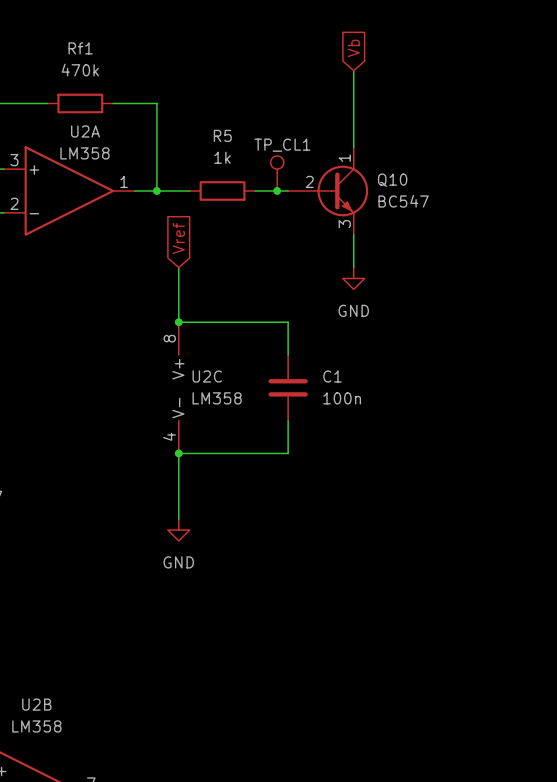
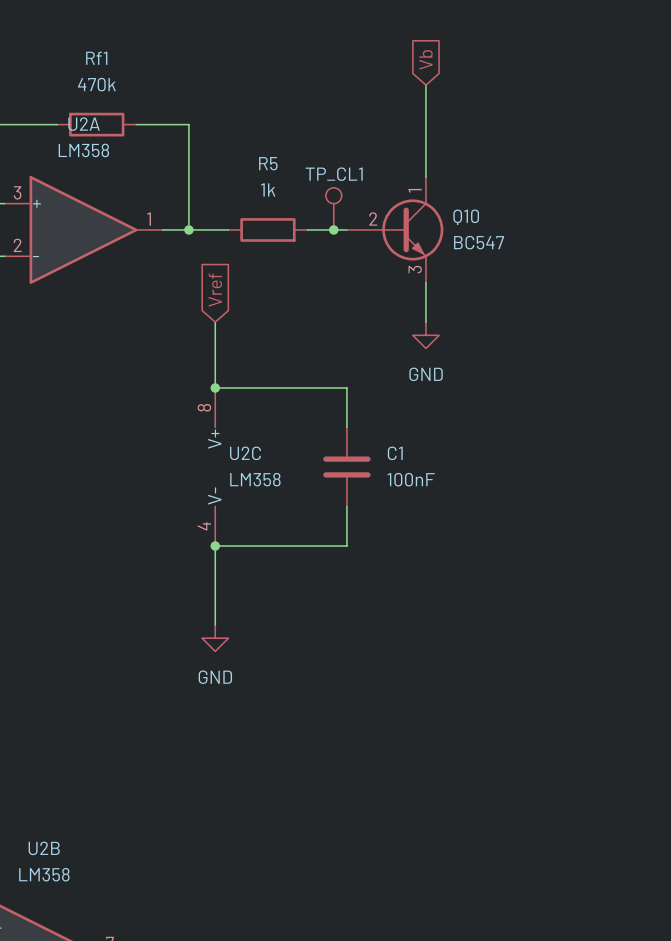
U2A name position: U2A (85, 131) -> U2A (84, 124)
U2A value position: LM358 (84, 153) -> LM358 (83, 150)
C1 value: 100n (342, 398) -> 100nF (411, 479)

